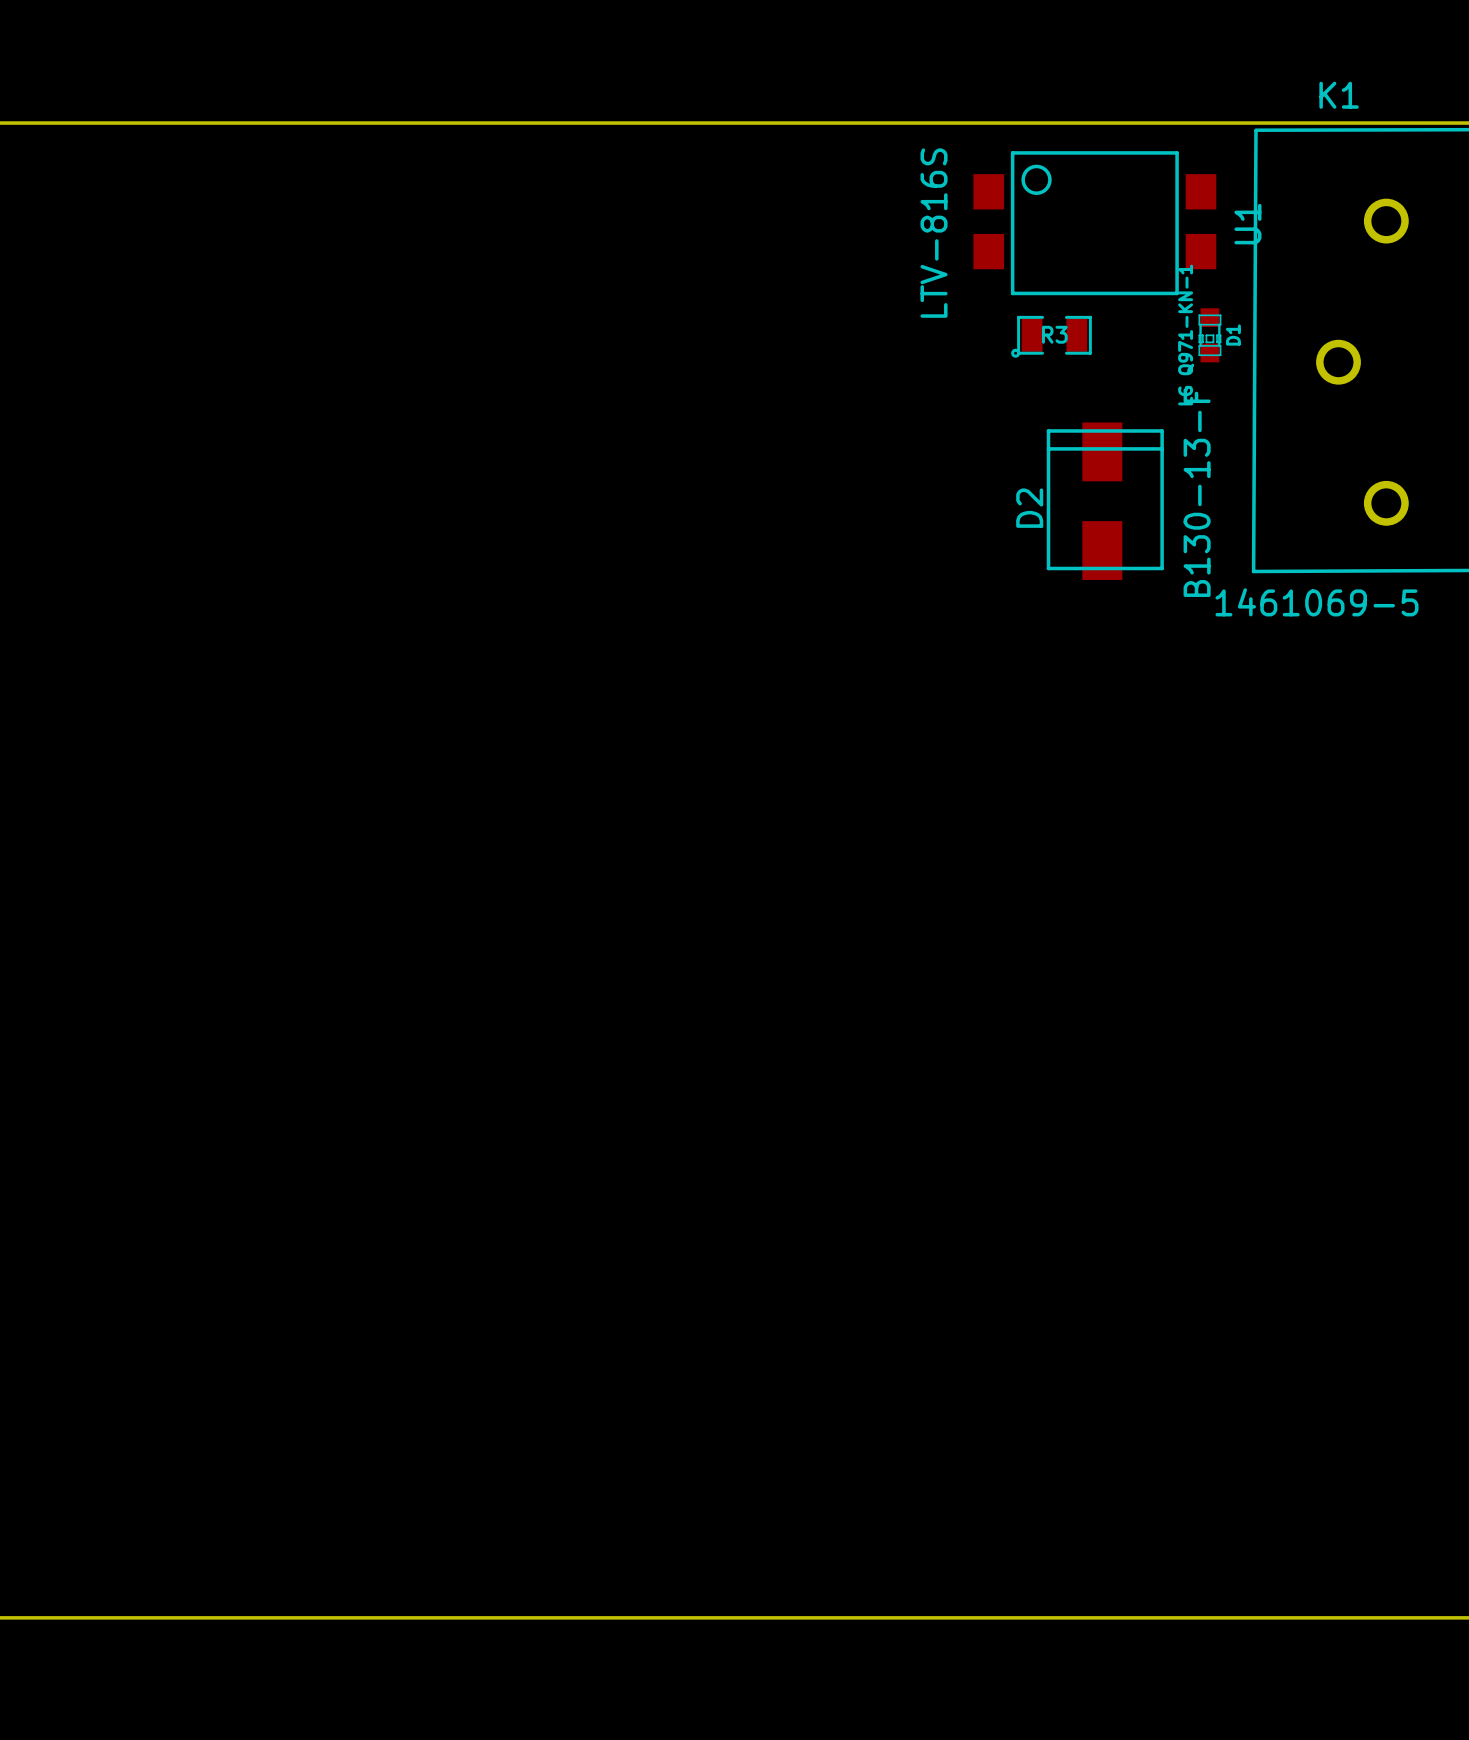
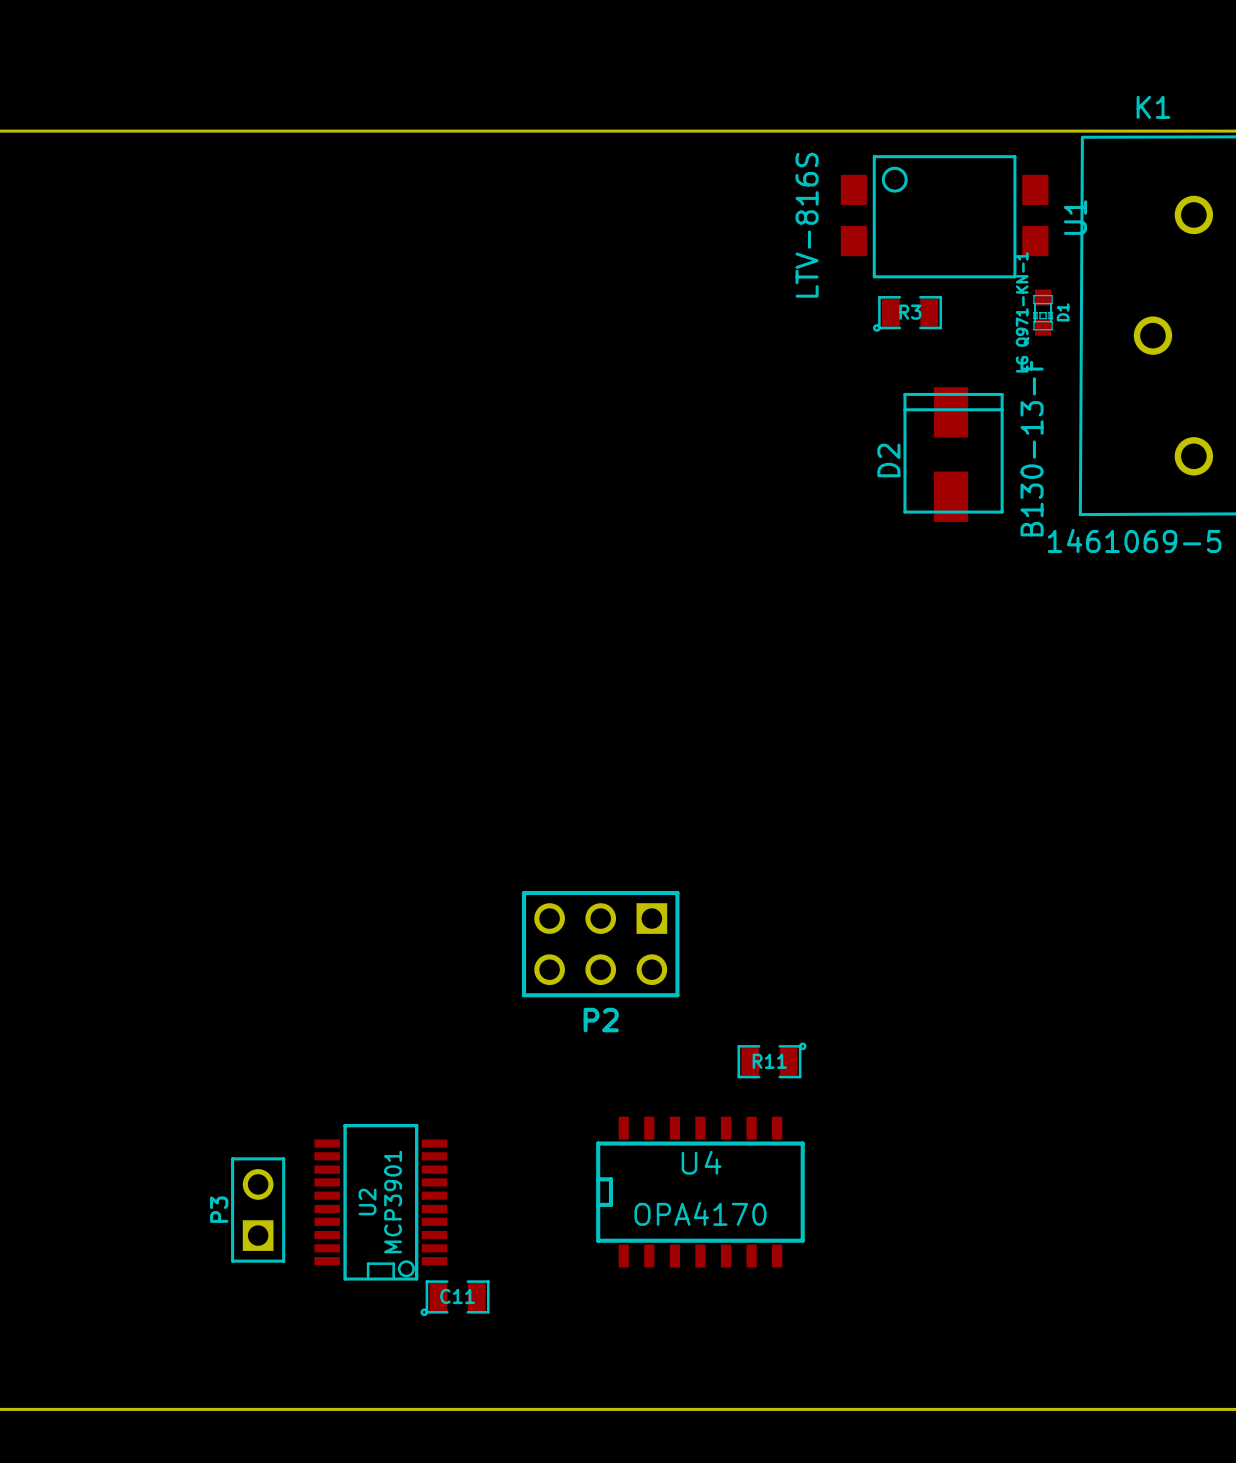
P2: none -> (600, 944)
R11: none -> (772, 1060)
U4: none -> OPA4170 (700, 1192)
U2: none -> MCP3901 (380, 1202)
P3: none -> (258, 1210)
C11: none -> (455, 1298)

